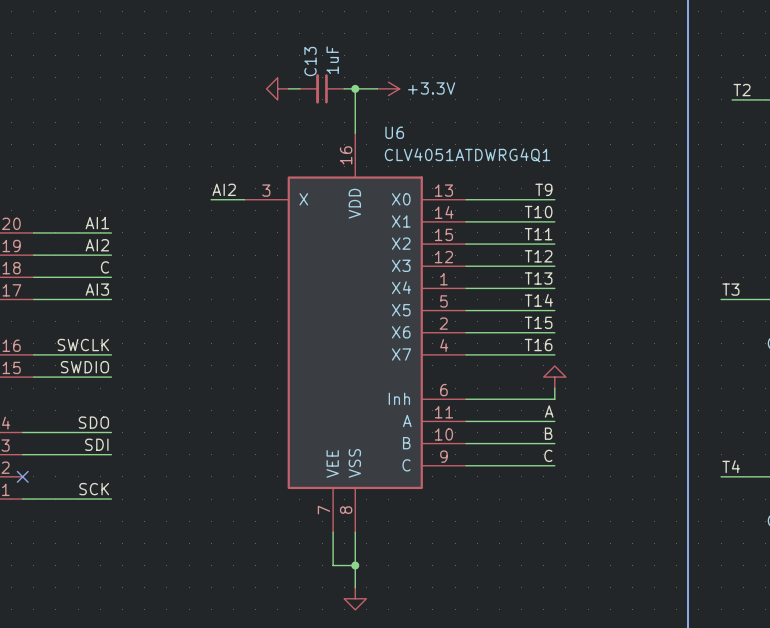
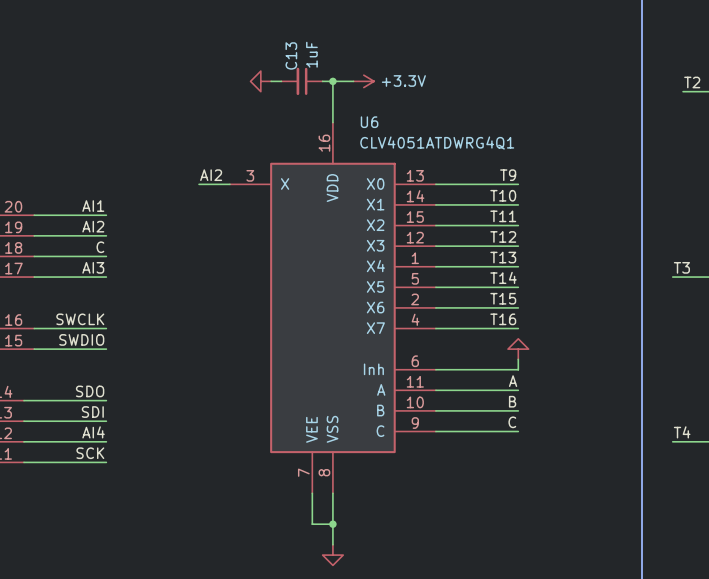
label: none -> AI4 (93, 432)
wire: none -> (23, 441) (106, 441)
no-connect mark: (22, 476) -> none

